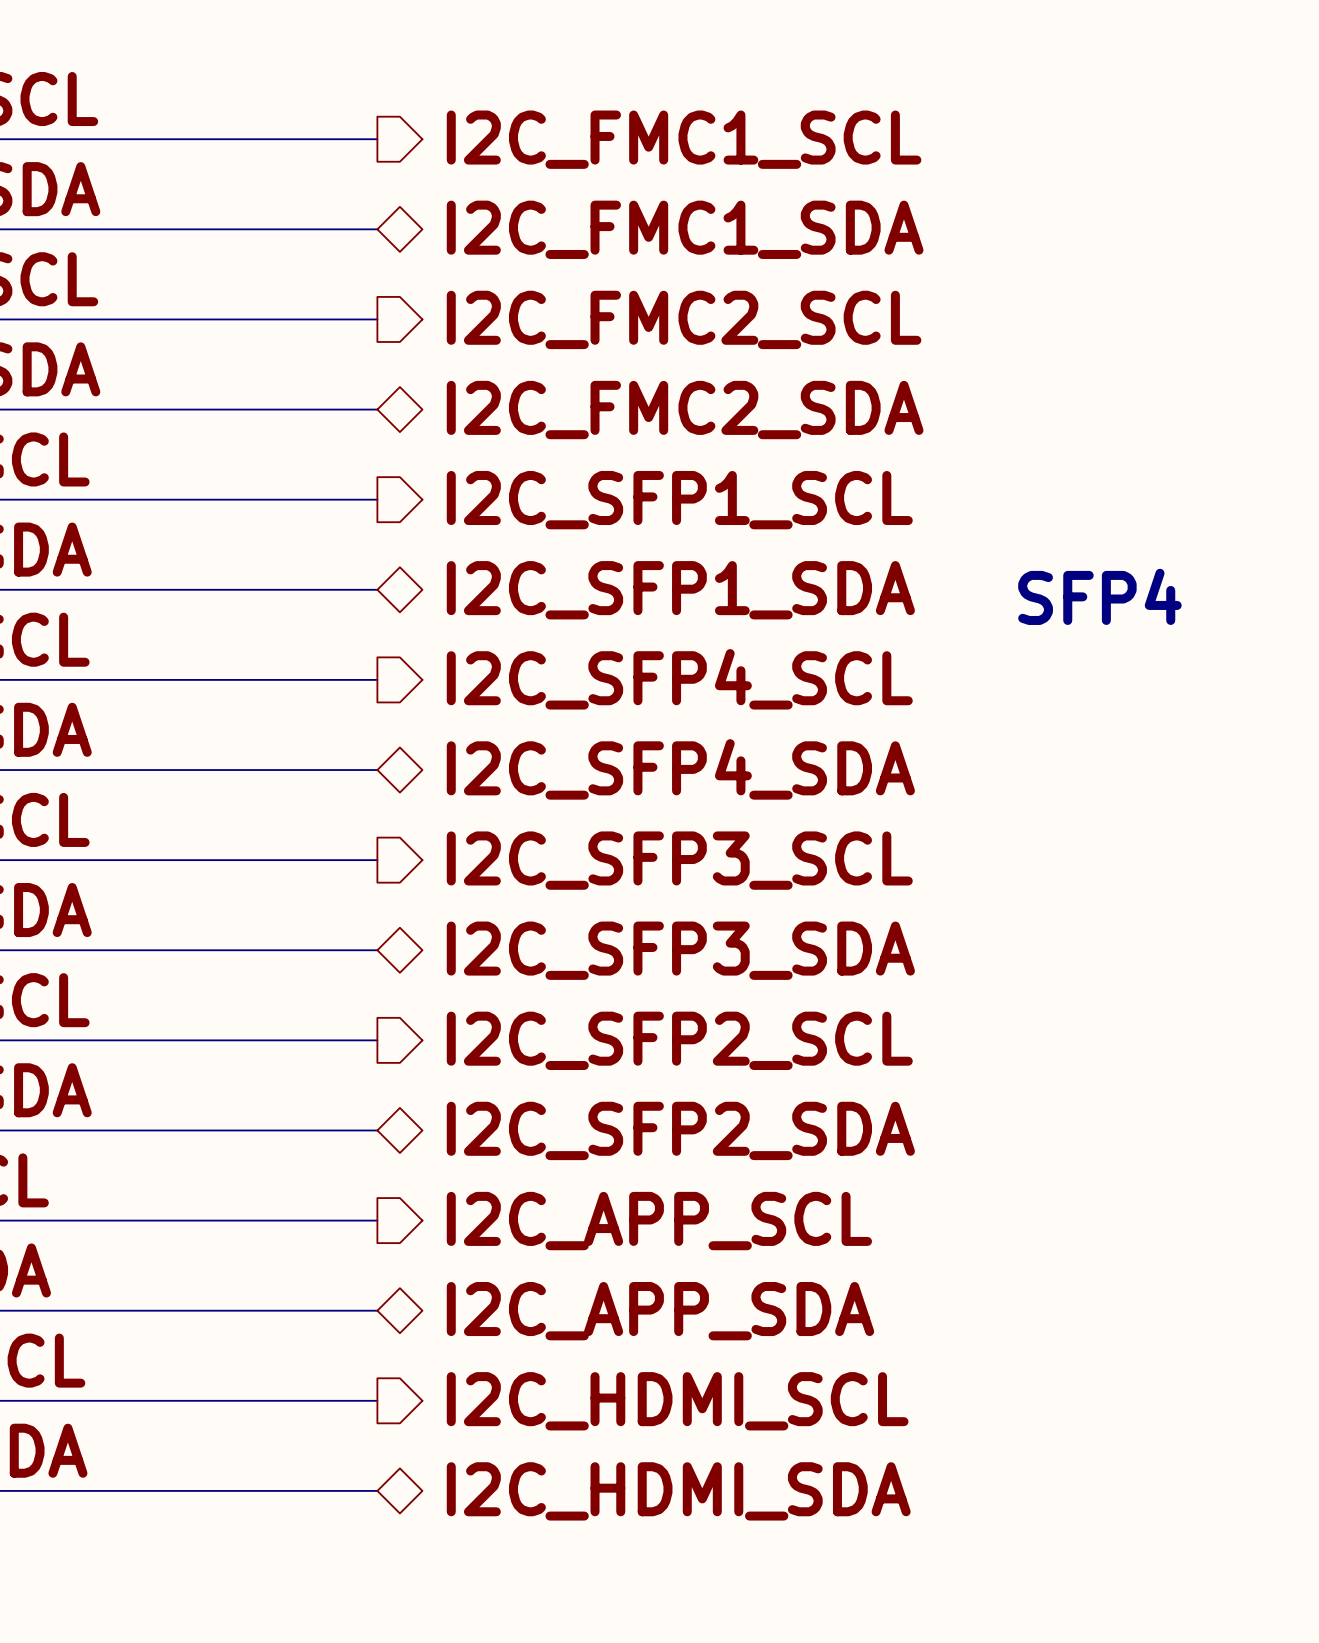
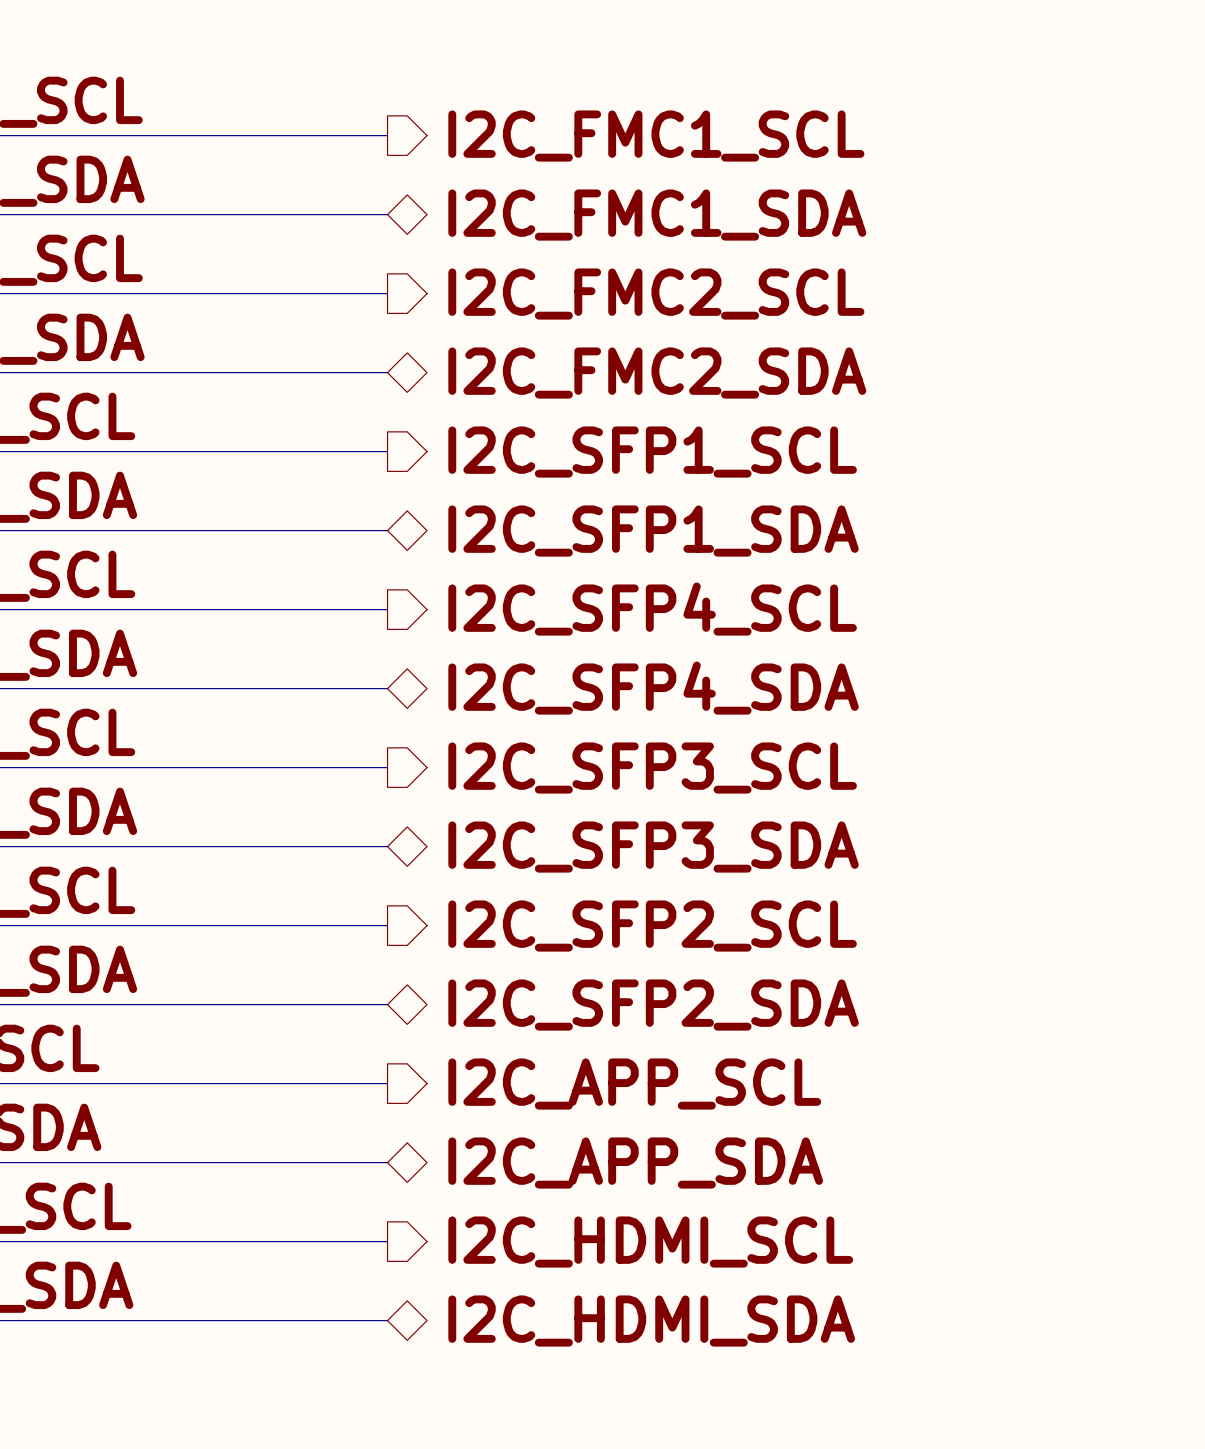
text: SFP4 (1099, 596) -> none

